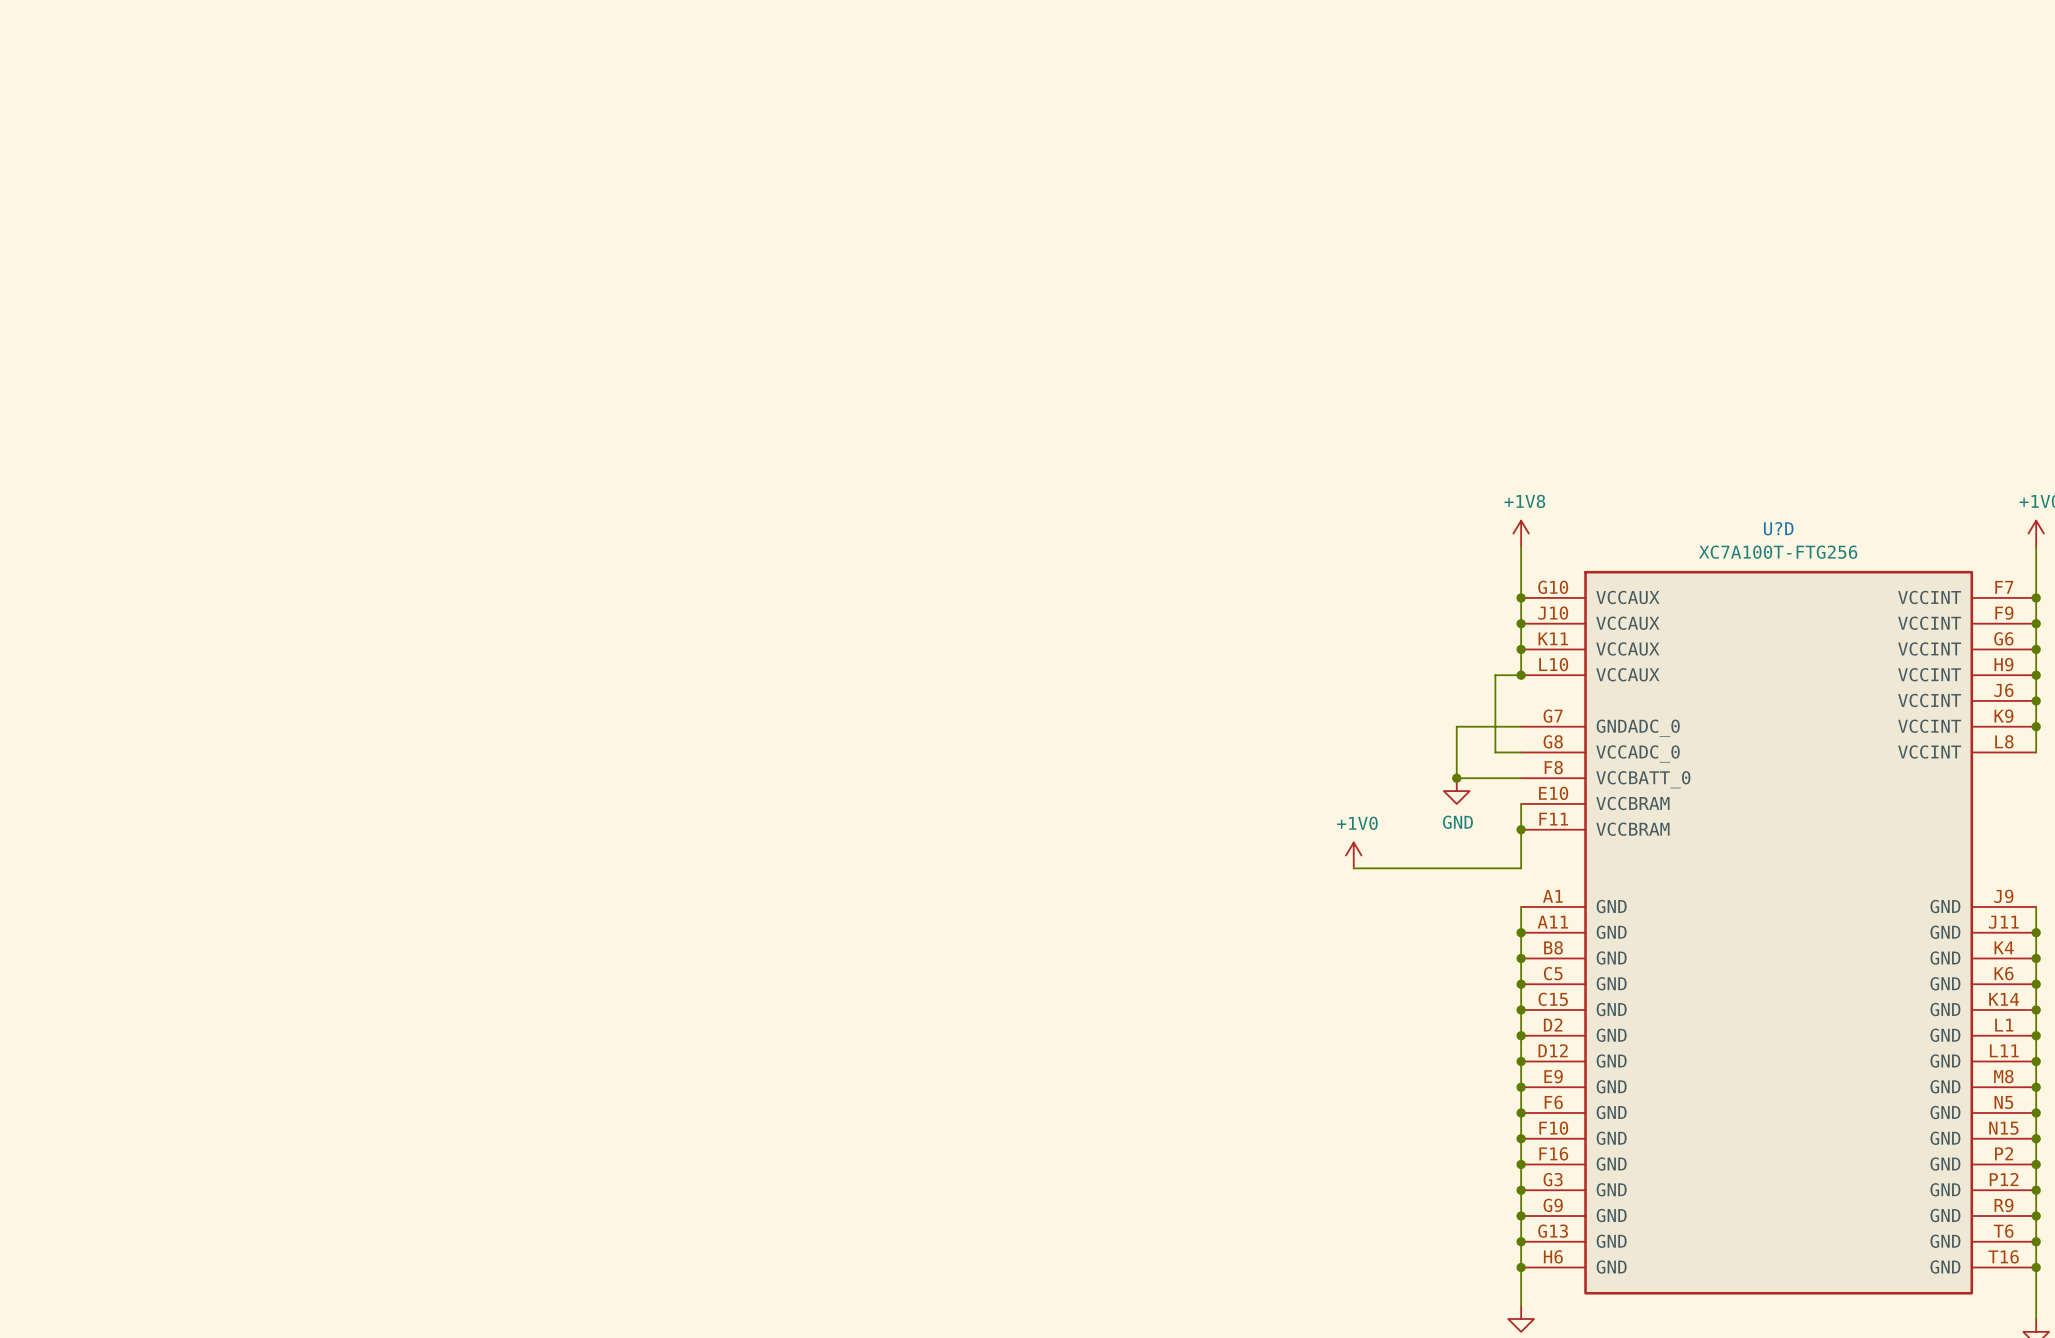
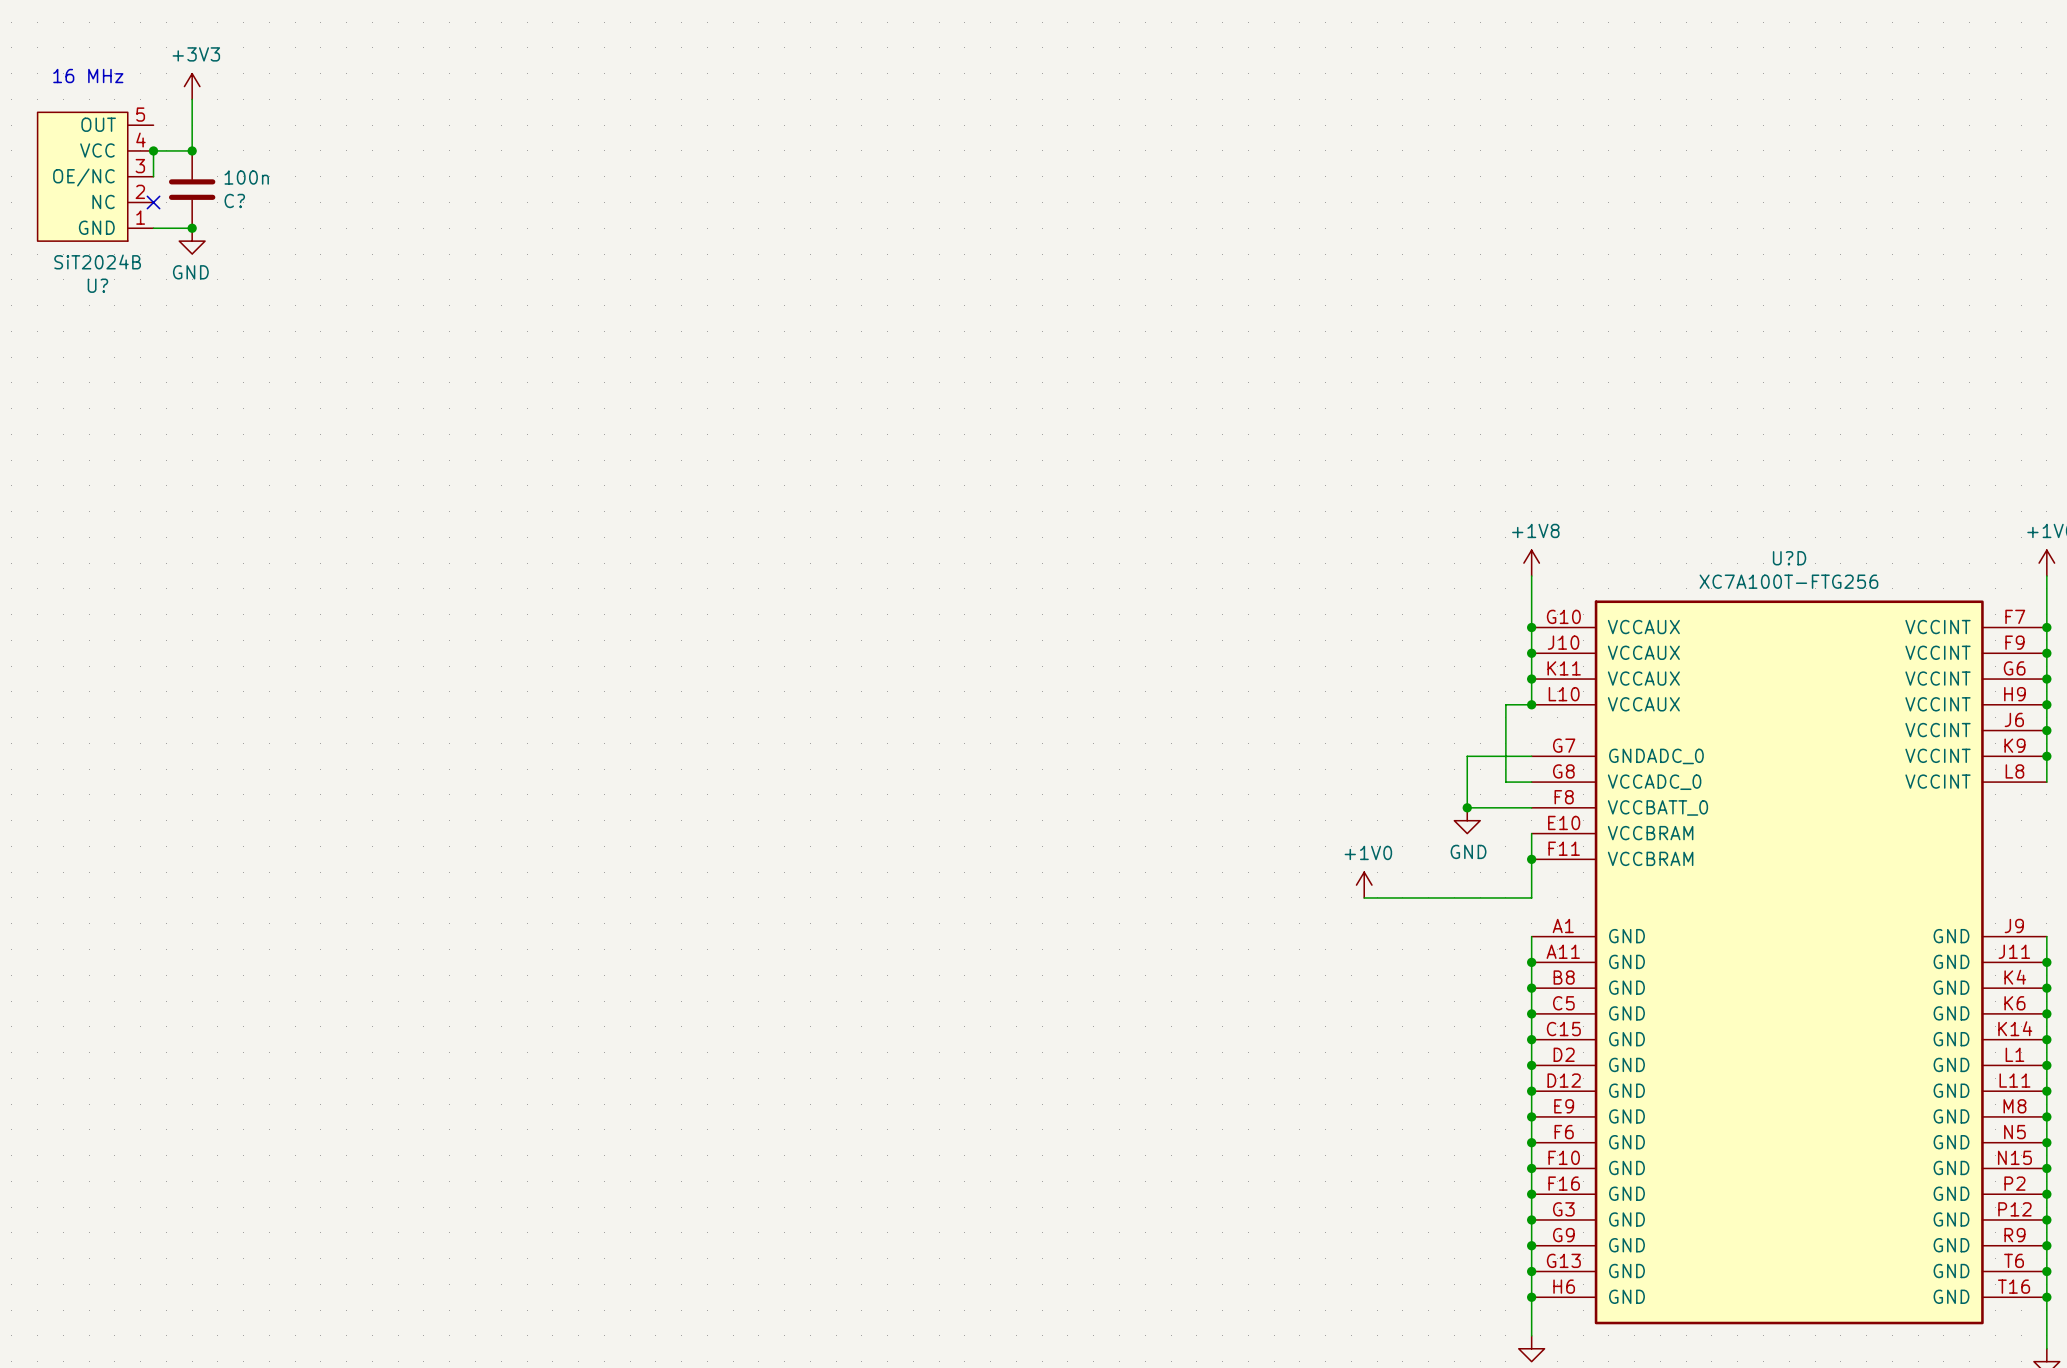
text: none -> 16 MHz (88, 76)
power symbol: none -> +3V3 (192, 86)
wire: none -> (192, 99) (192, 150) (153, 150) (153, 176)
junction: none -> (153, 150)
junction: none -> (192, 150)
U?: none -> SiT2024B (95, 176)
C?: none -> 100n (192, 189)
no-connect mark: none -> (153, 202)
wire: none -> (153, 228) (192, 228)
junction: none -> (192, 228)
power symbol: none -> GND (192, 241)

